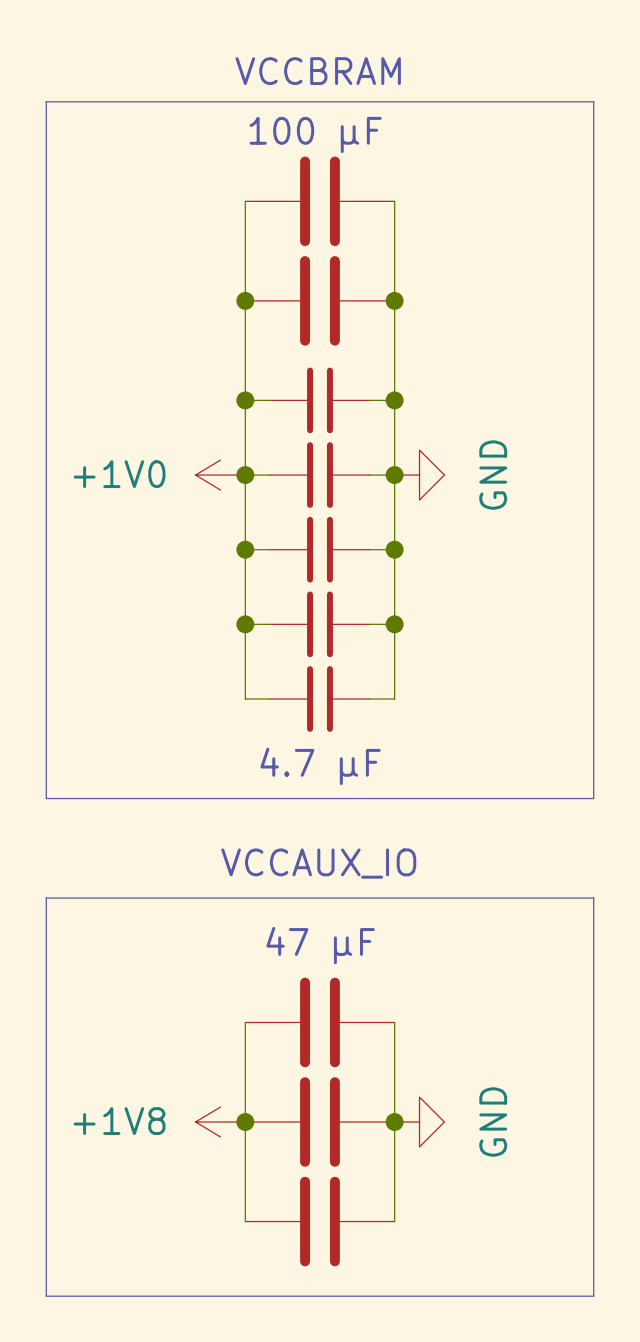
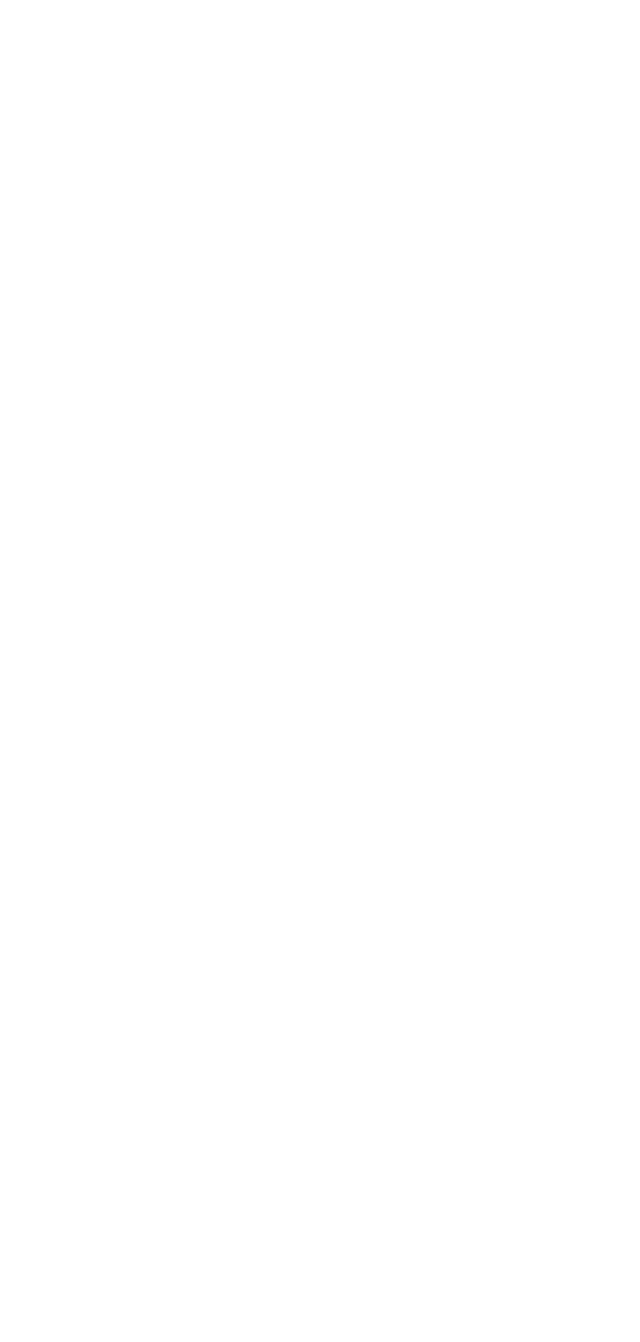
text: VCCBRAM (318, 71) -> none
line: (46, 101) (593, 101) (593, 798) (46, 798) (46, 101) -> none
text: 100 μF (315, 134) -> none
wire: (245, 201) (245, 699) (270, 699) -> none
part: (319, 201) -> none
wire: (394, 201) (394, 699) (369, 699) -> none
junction: (245, 300) -> none
part: (319, 300) -> none
junction: (394, 300) -> none
wire: (245, 400) (270, 400) -> none
junction: (245, 400) -> none
part: (319, 400) -> none
wire: (369, 400) (394, 400) -> none
junction: (394, 400) -> none
power symbol: +1V0 (220, 475) -> none
wire: (245, 475) (270, 475) -> none
junction: (245, 475) -> none
part: (319, 475) -> none
wire: (369, 475) (394, 475) -> none
junction: (394, 475) -> none
power symbol: GND (419, 475) -> none
wire: (245, 549) (270, 549) -> none
junction: (245, 549) -> none
part: (319, 549) -> none
wire: (369, 549) (394, 549) -> none
junction: (394, 549) -> none
wire: (245, 624) (270, 624) -> none
junction: (245, 624) -> none
part: (319, 624) -> none
wire: (369, 624) (394, 624) -> none
junction: (394, 624) -> none
part: (319, 699) -> none
text: 4.7 μF (320, 766) -> none
text: VCCAUX_IO (318, 863) -> none
line: (46, 898) (46, 1296) (593, 1296) (593, 898) (46, 898) -> none
text: 47 μF (320, 945) -> none
wire: (245, 1022) (245, 1221) -> none
part: (319, 1022) -> none
wire: (394, 1022) (394, 1221) -> none
power symbol: +1V8 (220, 1122) -> none
junction: (245, 1122) -> none
part: (319, 1122) -> none
junction: (394, 1122) -> none
power symbol: GND (419, 1122) -> none
part: (319, 1221) -> none

